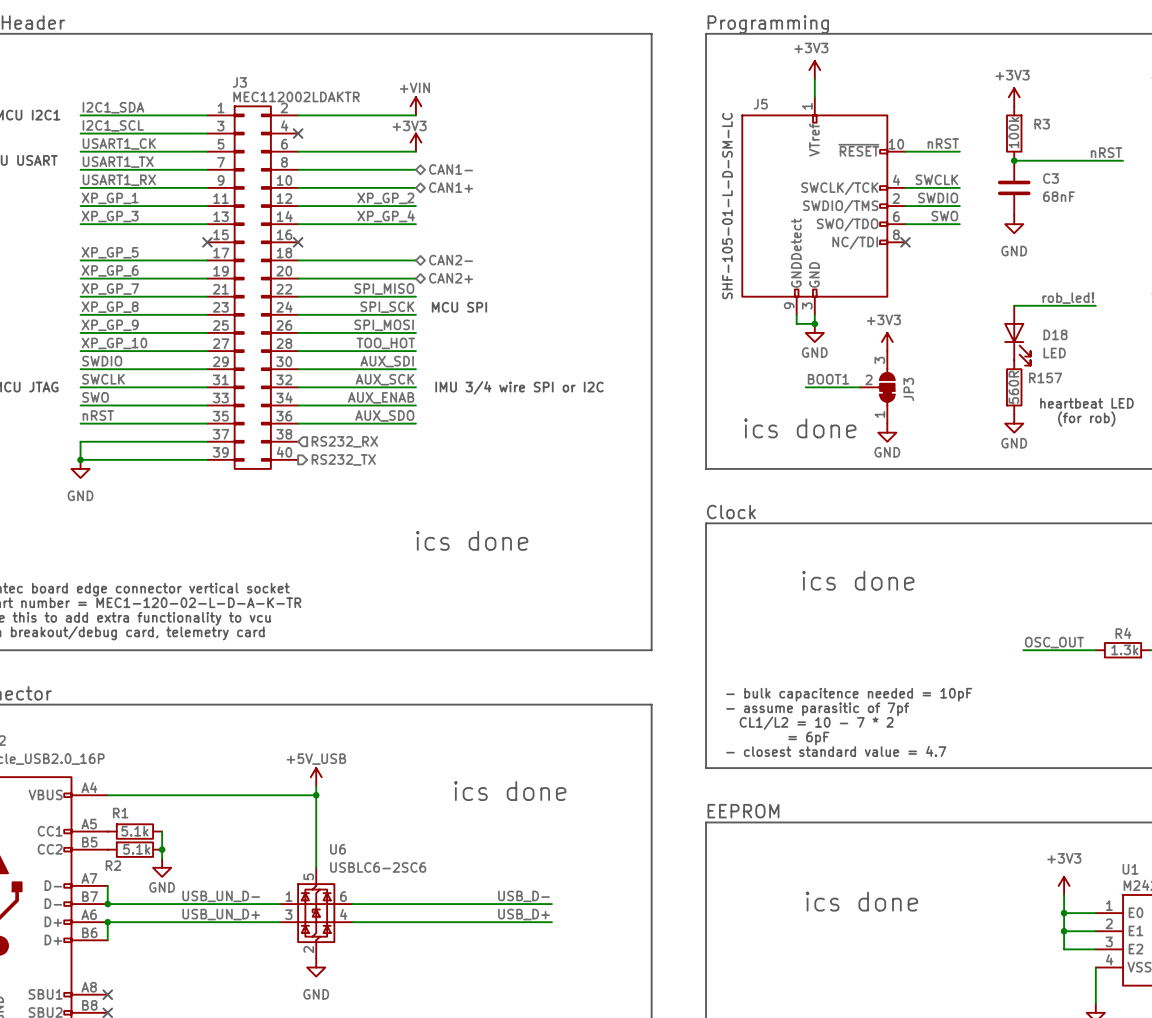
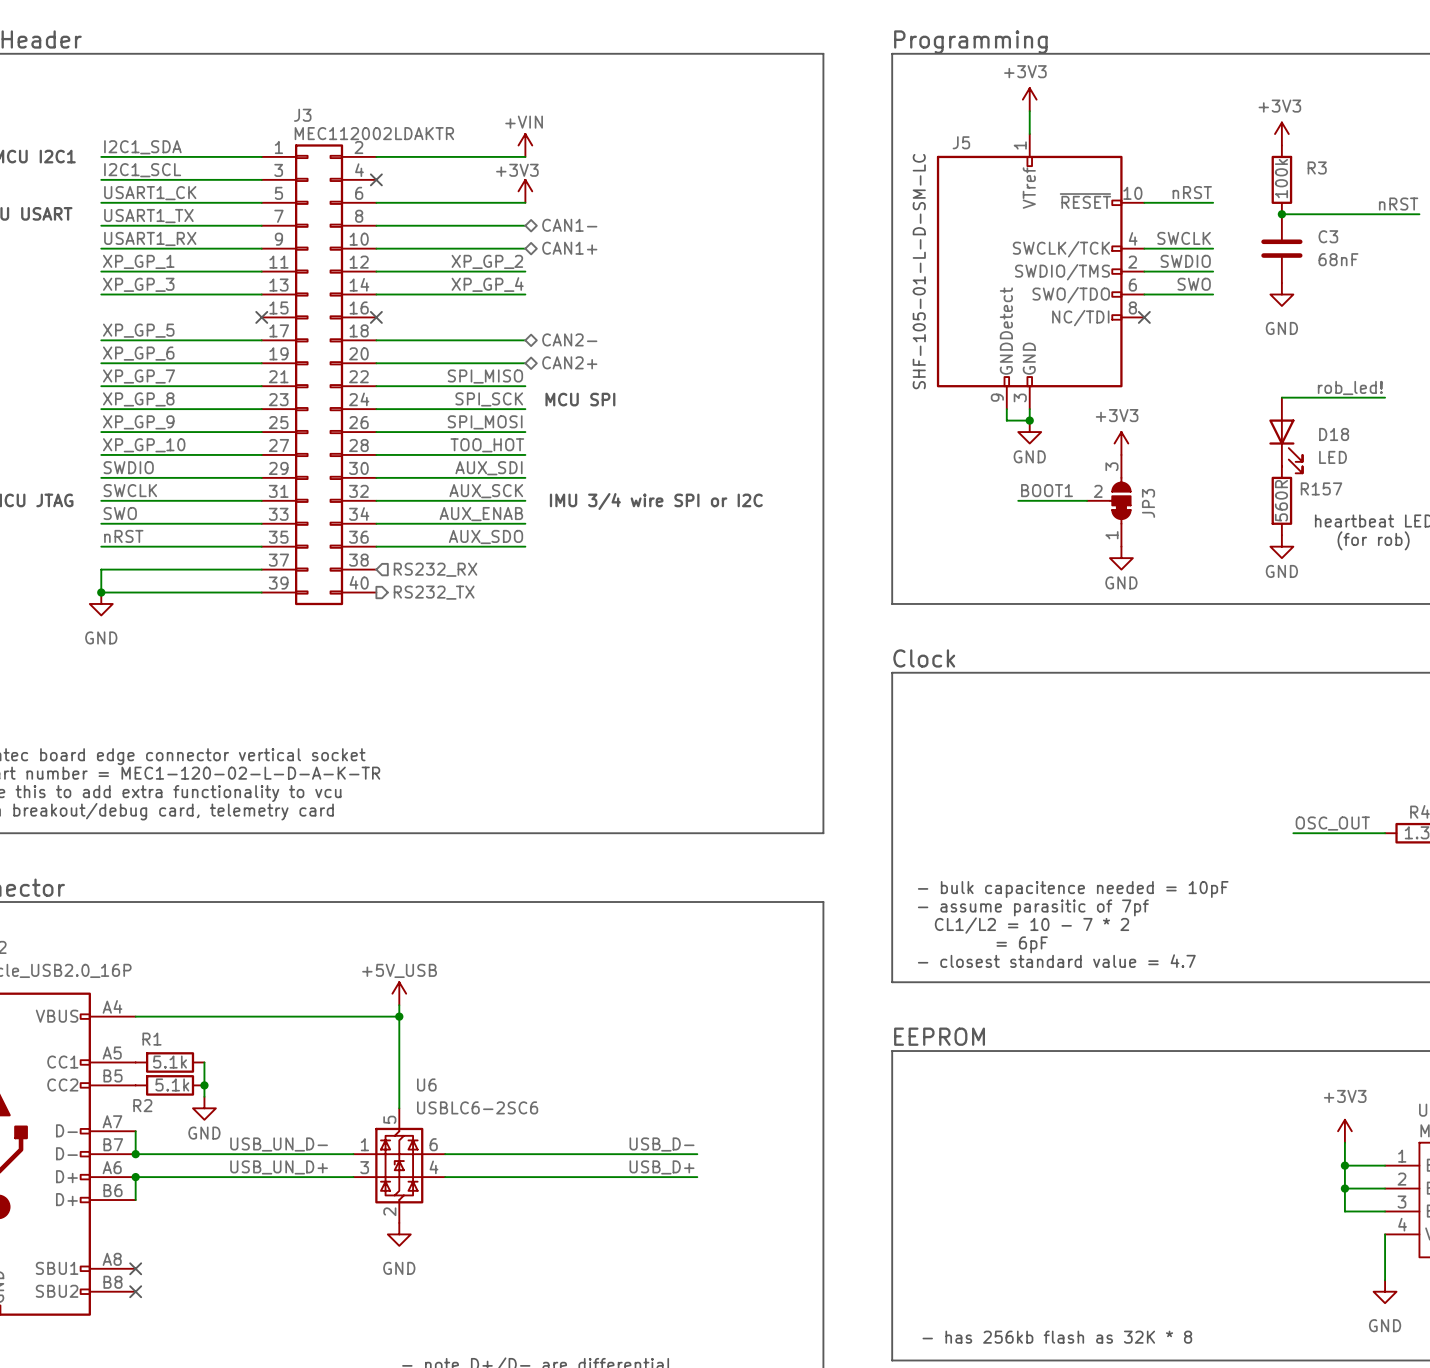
text: ics done (800, 428) -> none
text: ics done (472, 540) -> none
text: ics done (858, 580) -> none
text: ics done (510, 791) -> none
text: ics done (861, 901) -> none

